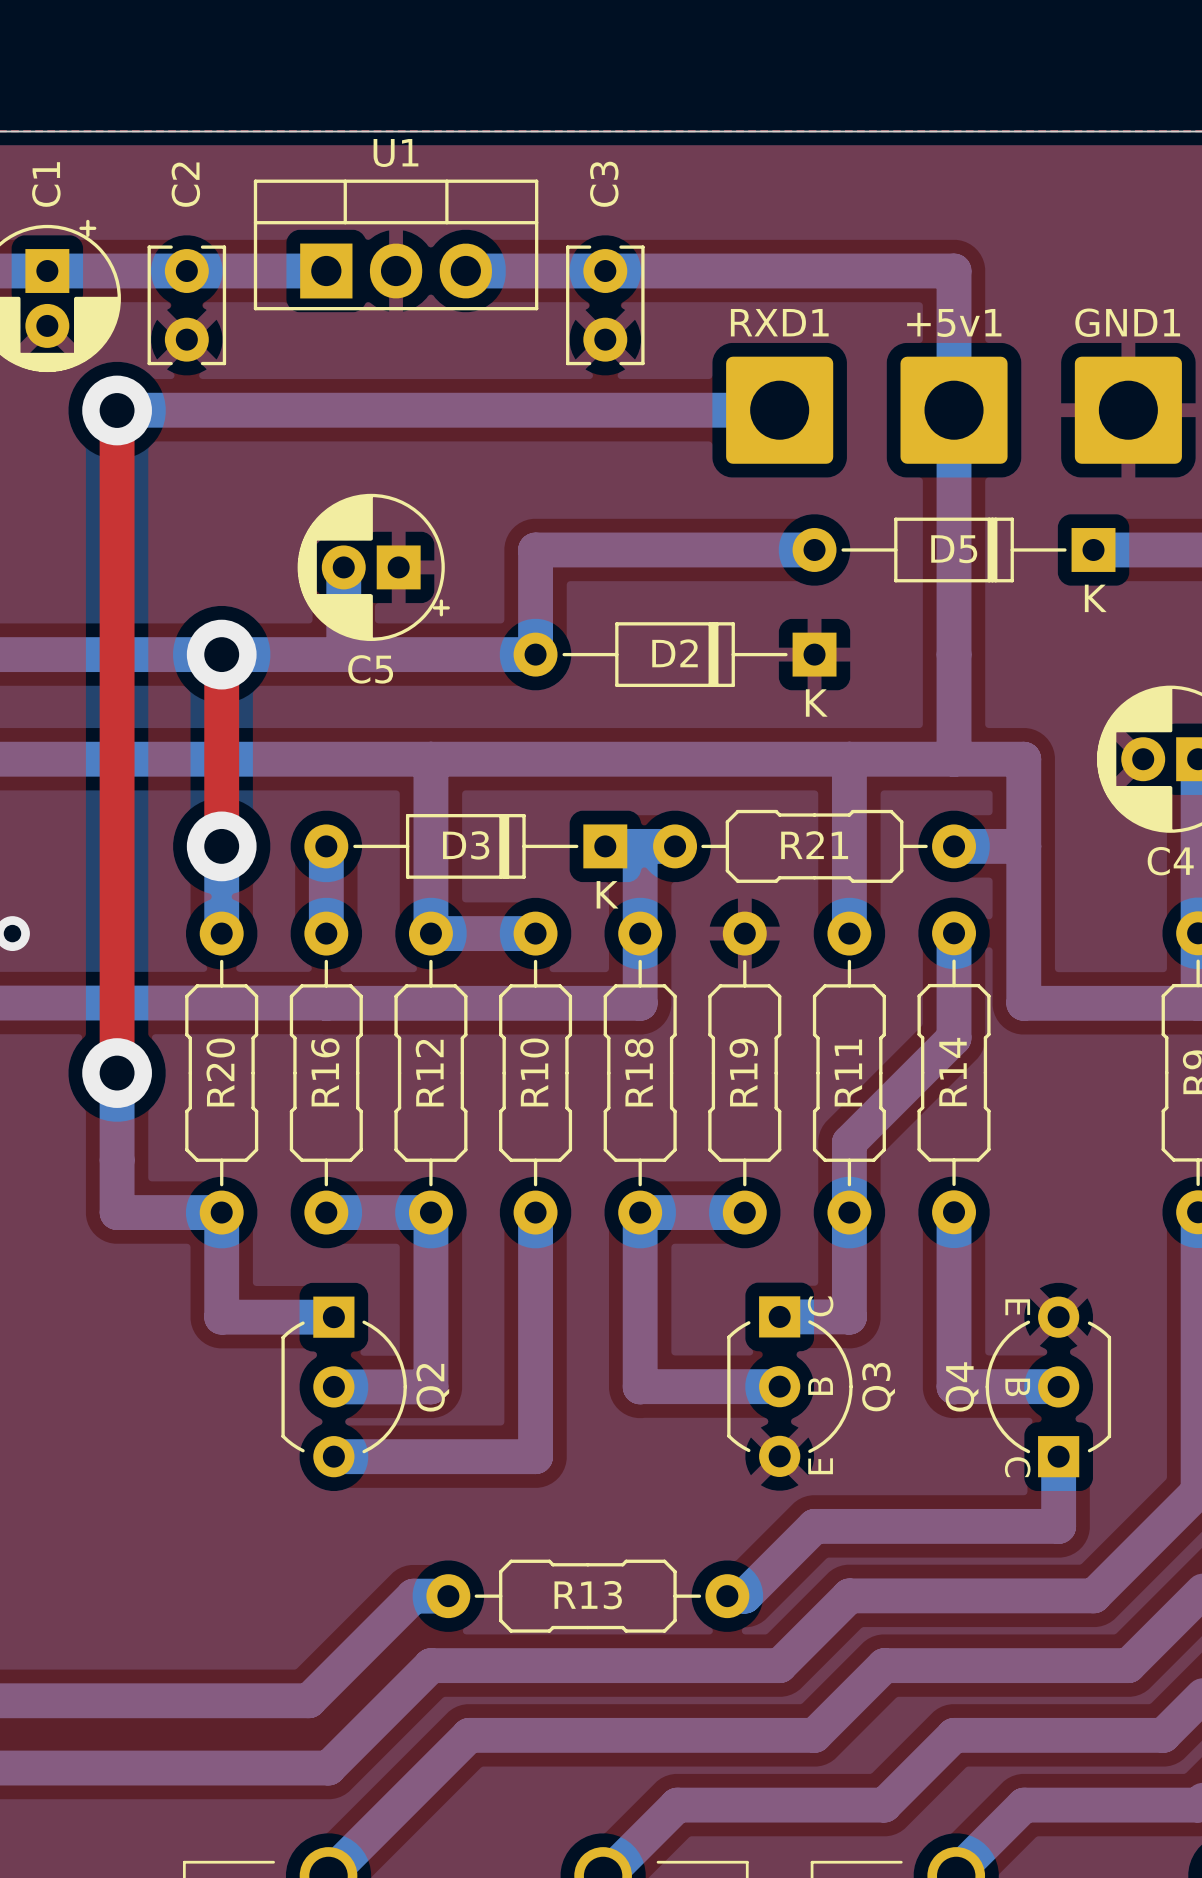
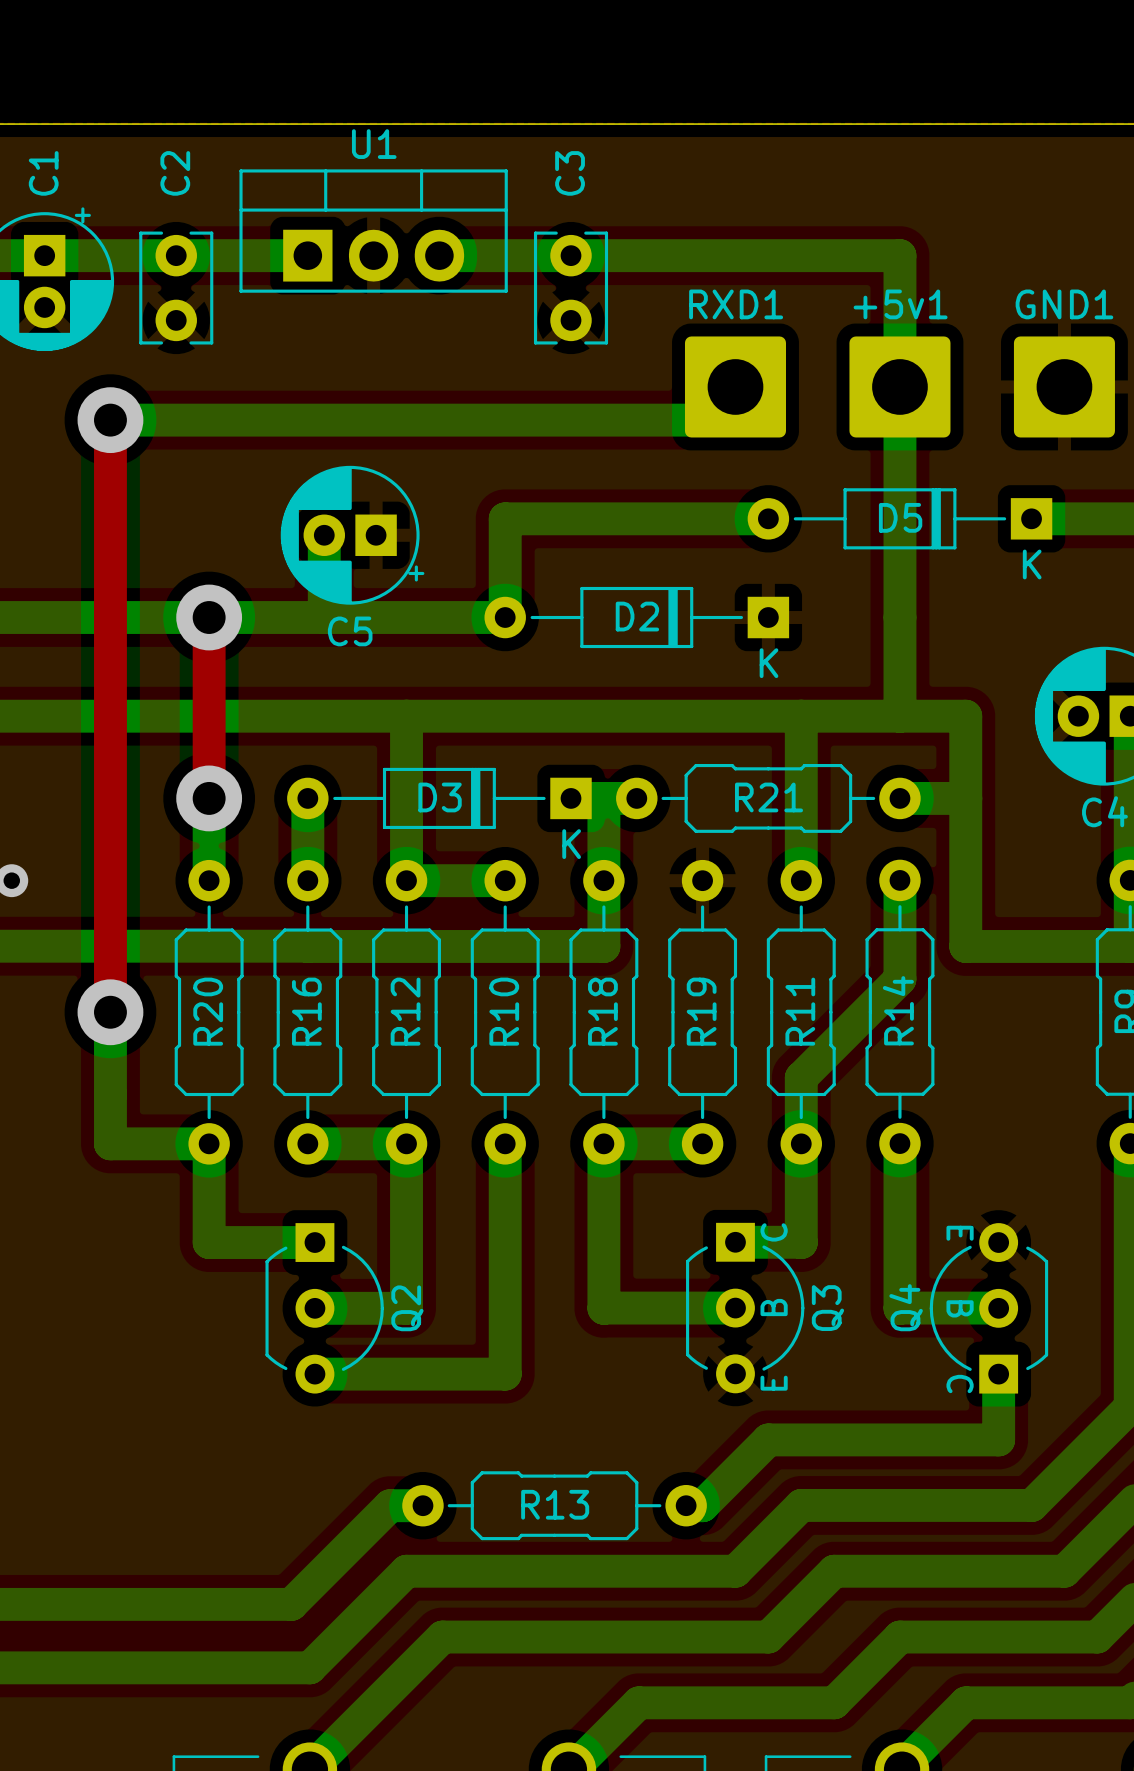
bottom track: (117, 410) (779, 410) -> (110, 420) (702, 420) (735, 386)
via position: (117, 410) -> (110, 420)

